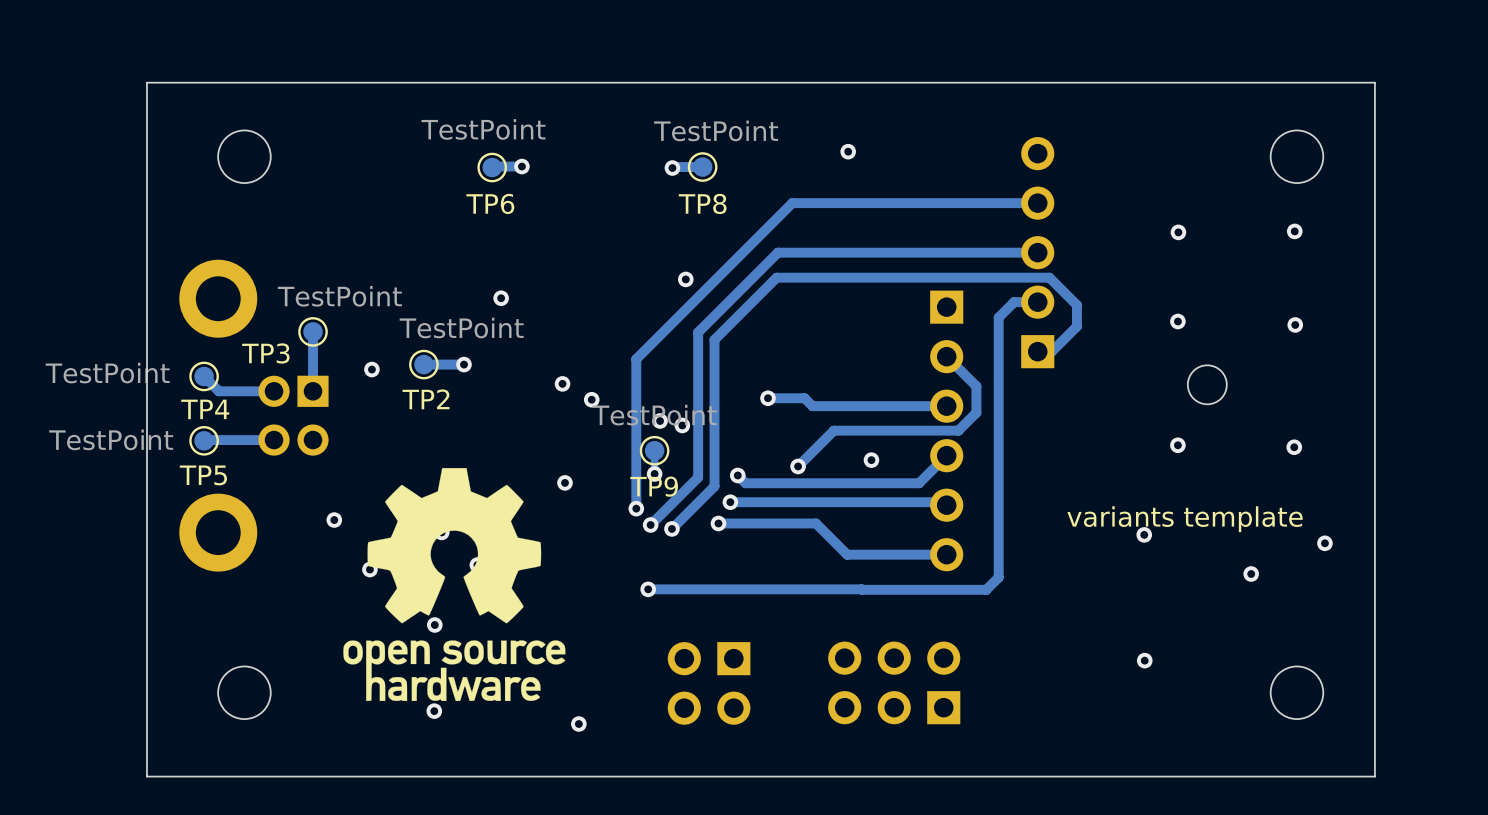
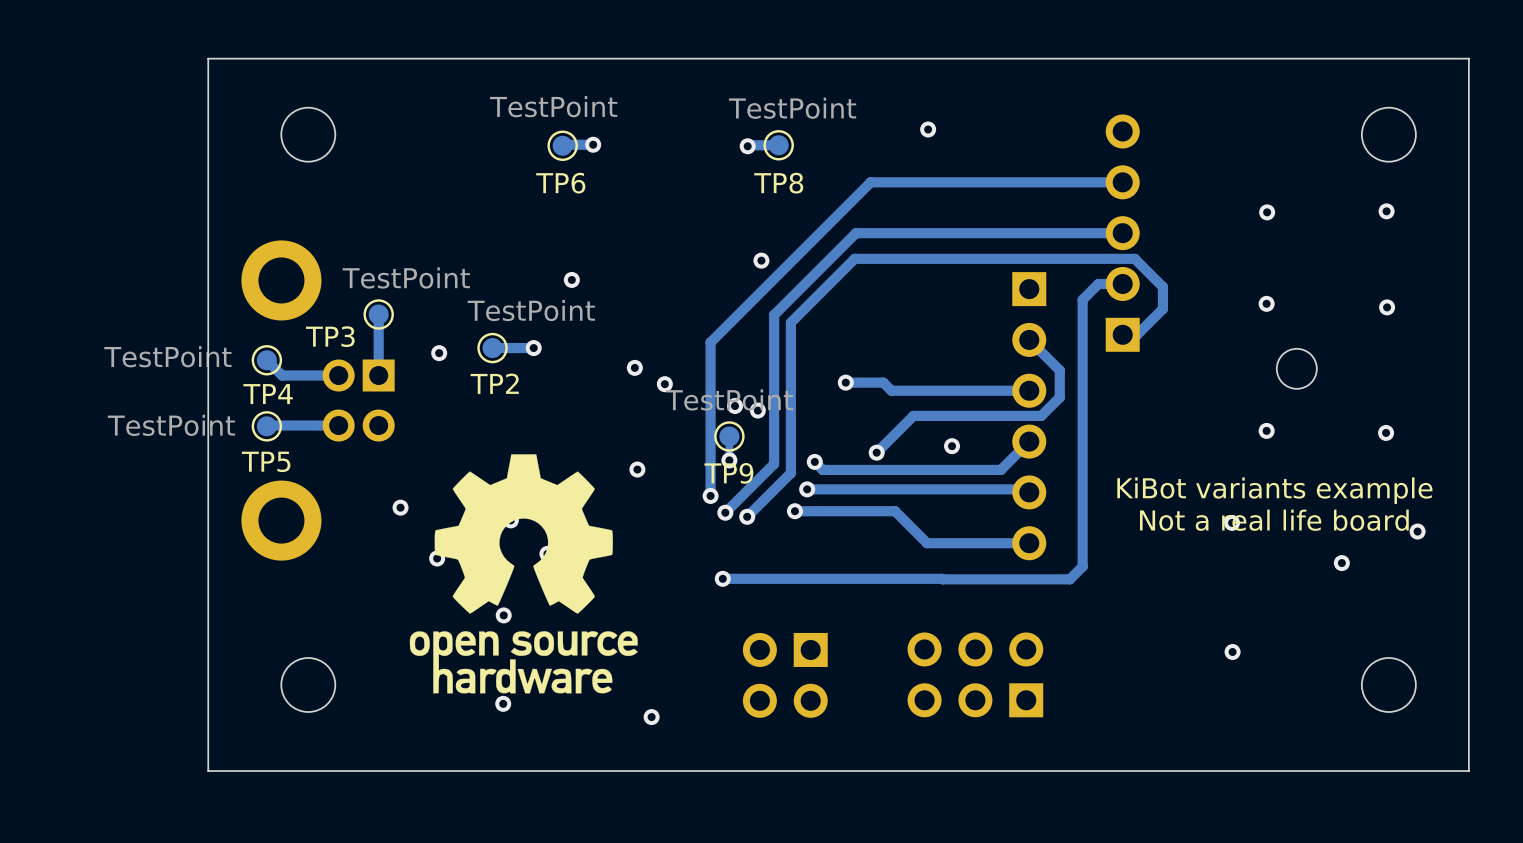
text: variants template (1185, 519) -> KiBot variants example (1274, 490)
text: none -> Not a real life board (1274, 520)

